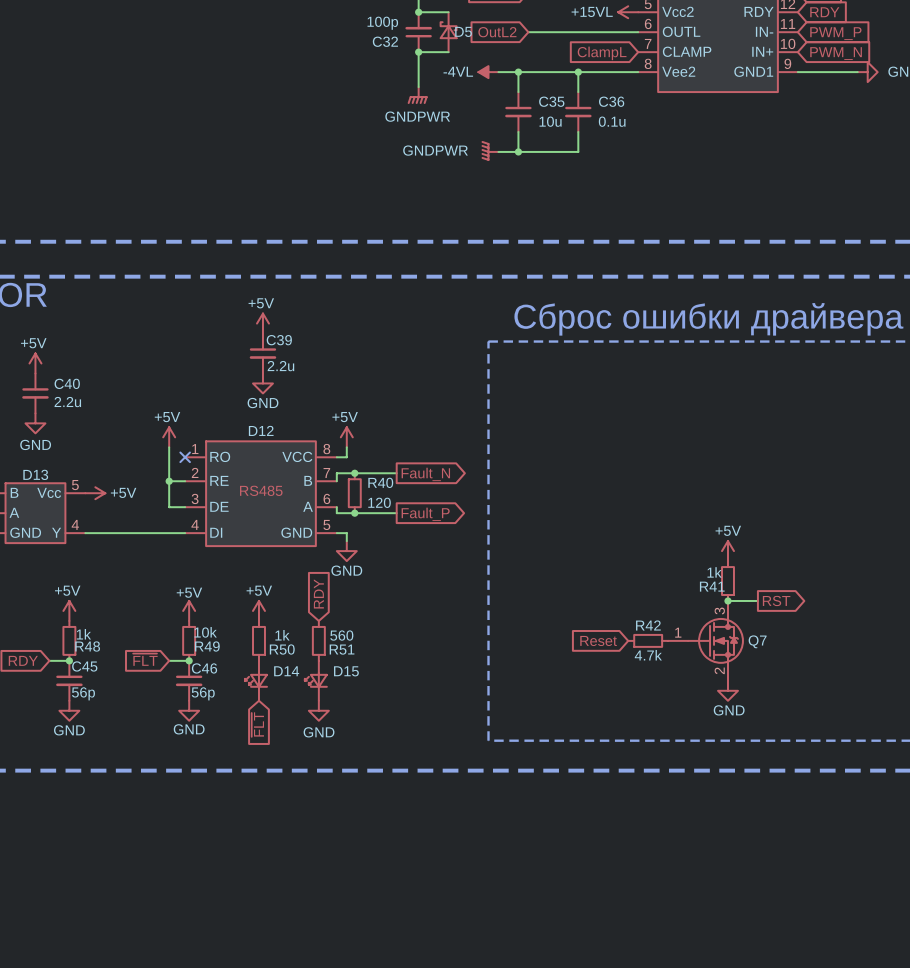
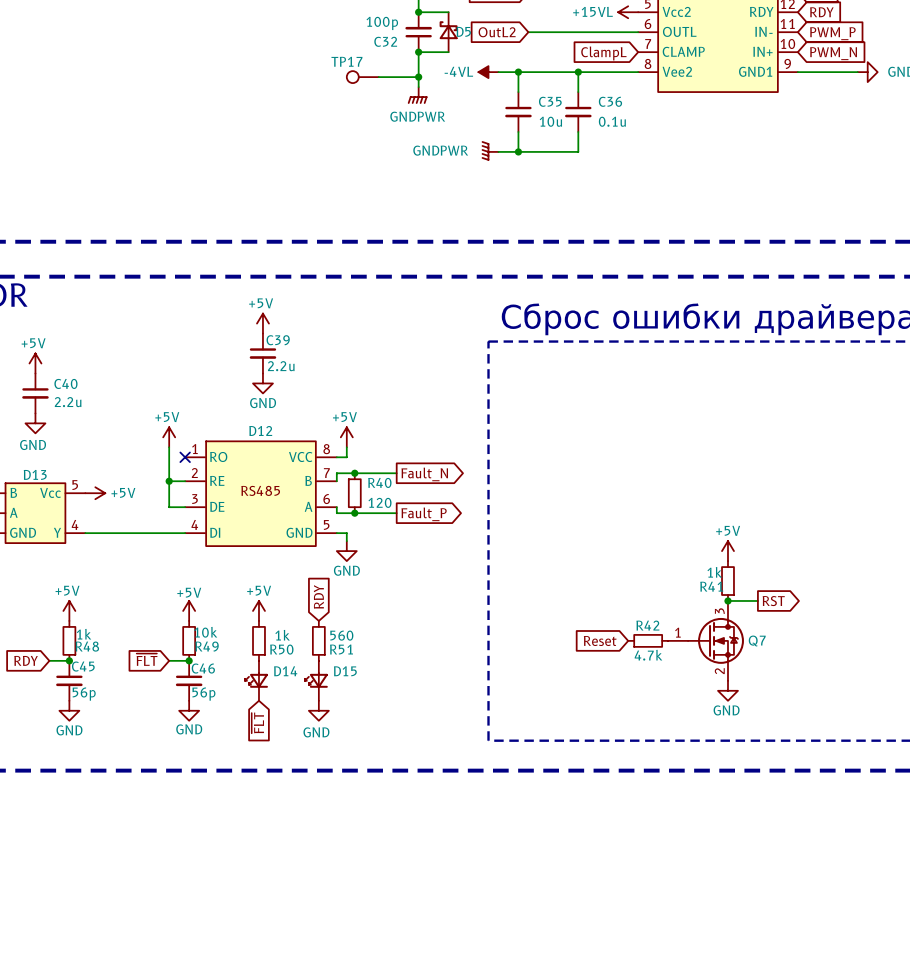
TP17: none -> (362, 77)
wire: none -> (378, 77) (418, 77)
junction: none -> (418, 77)

